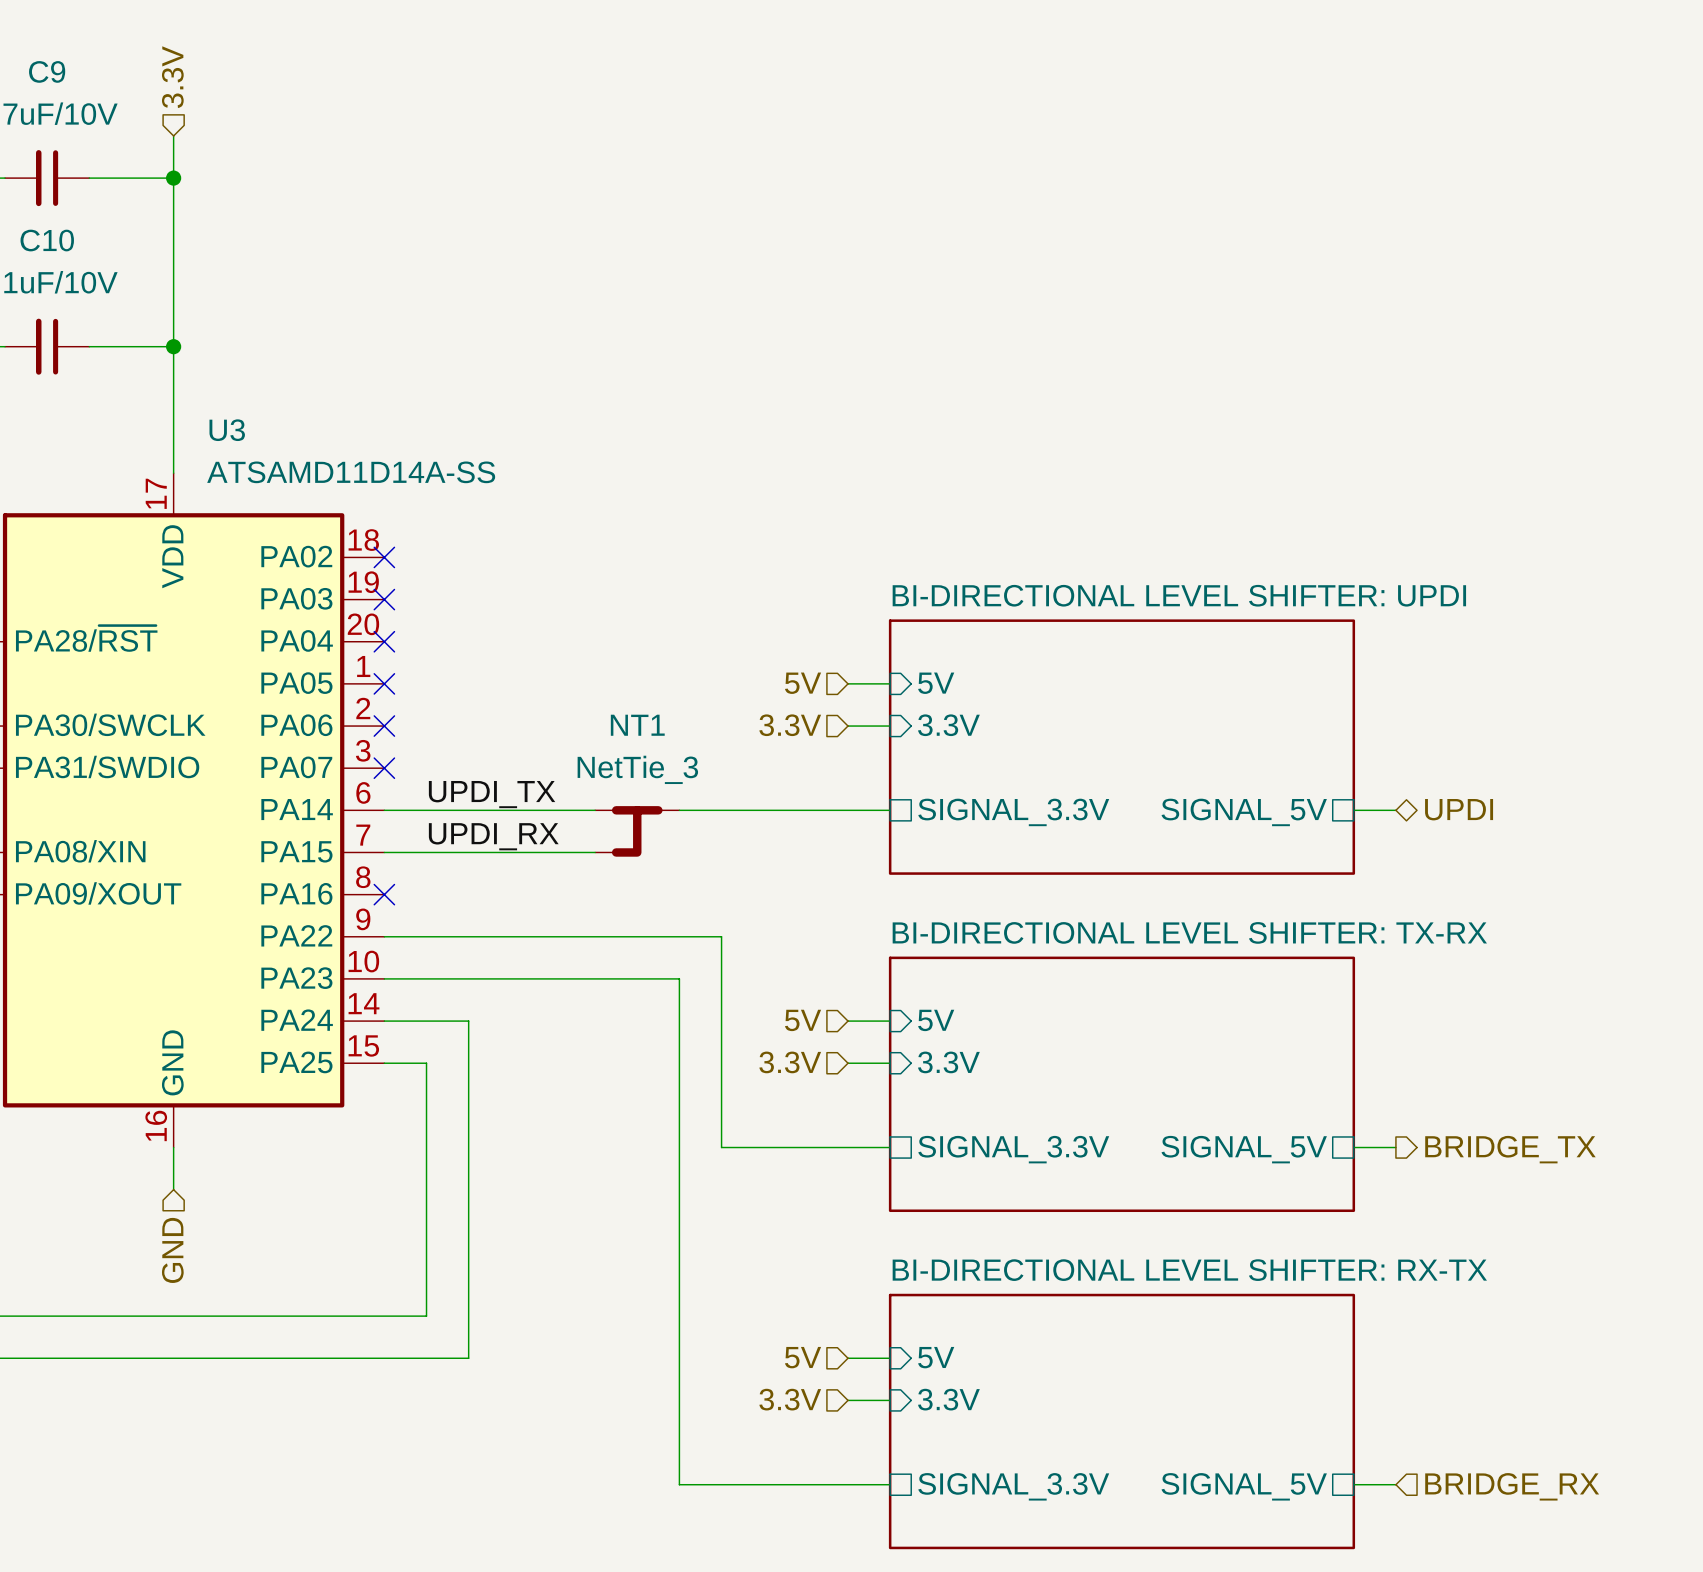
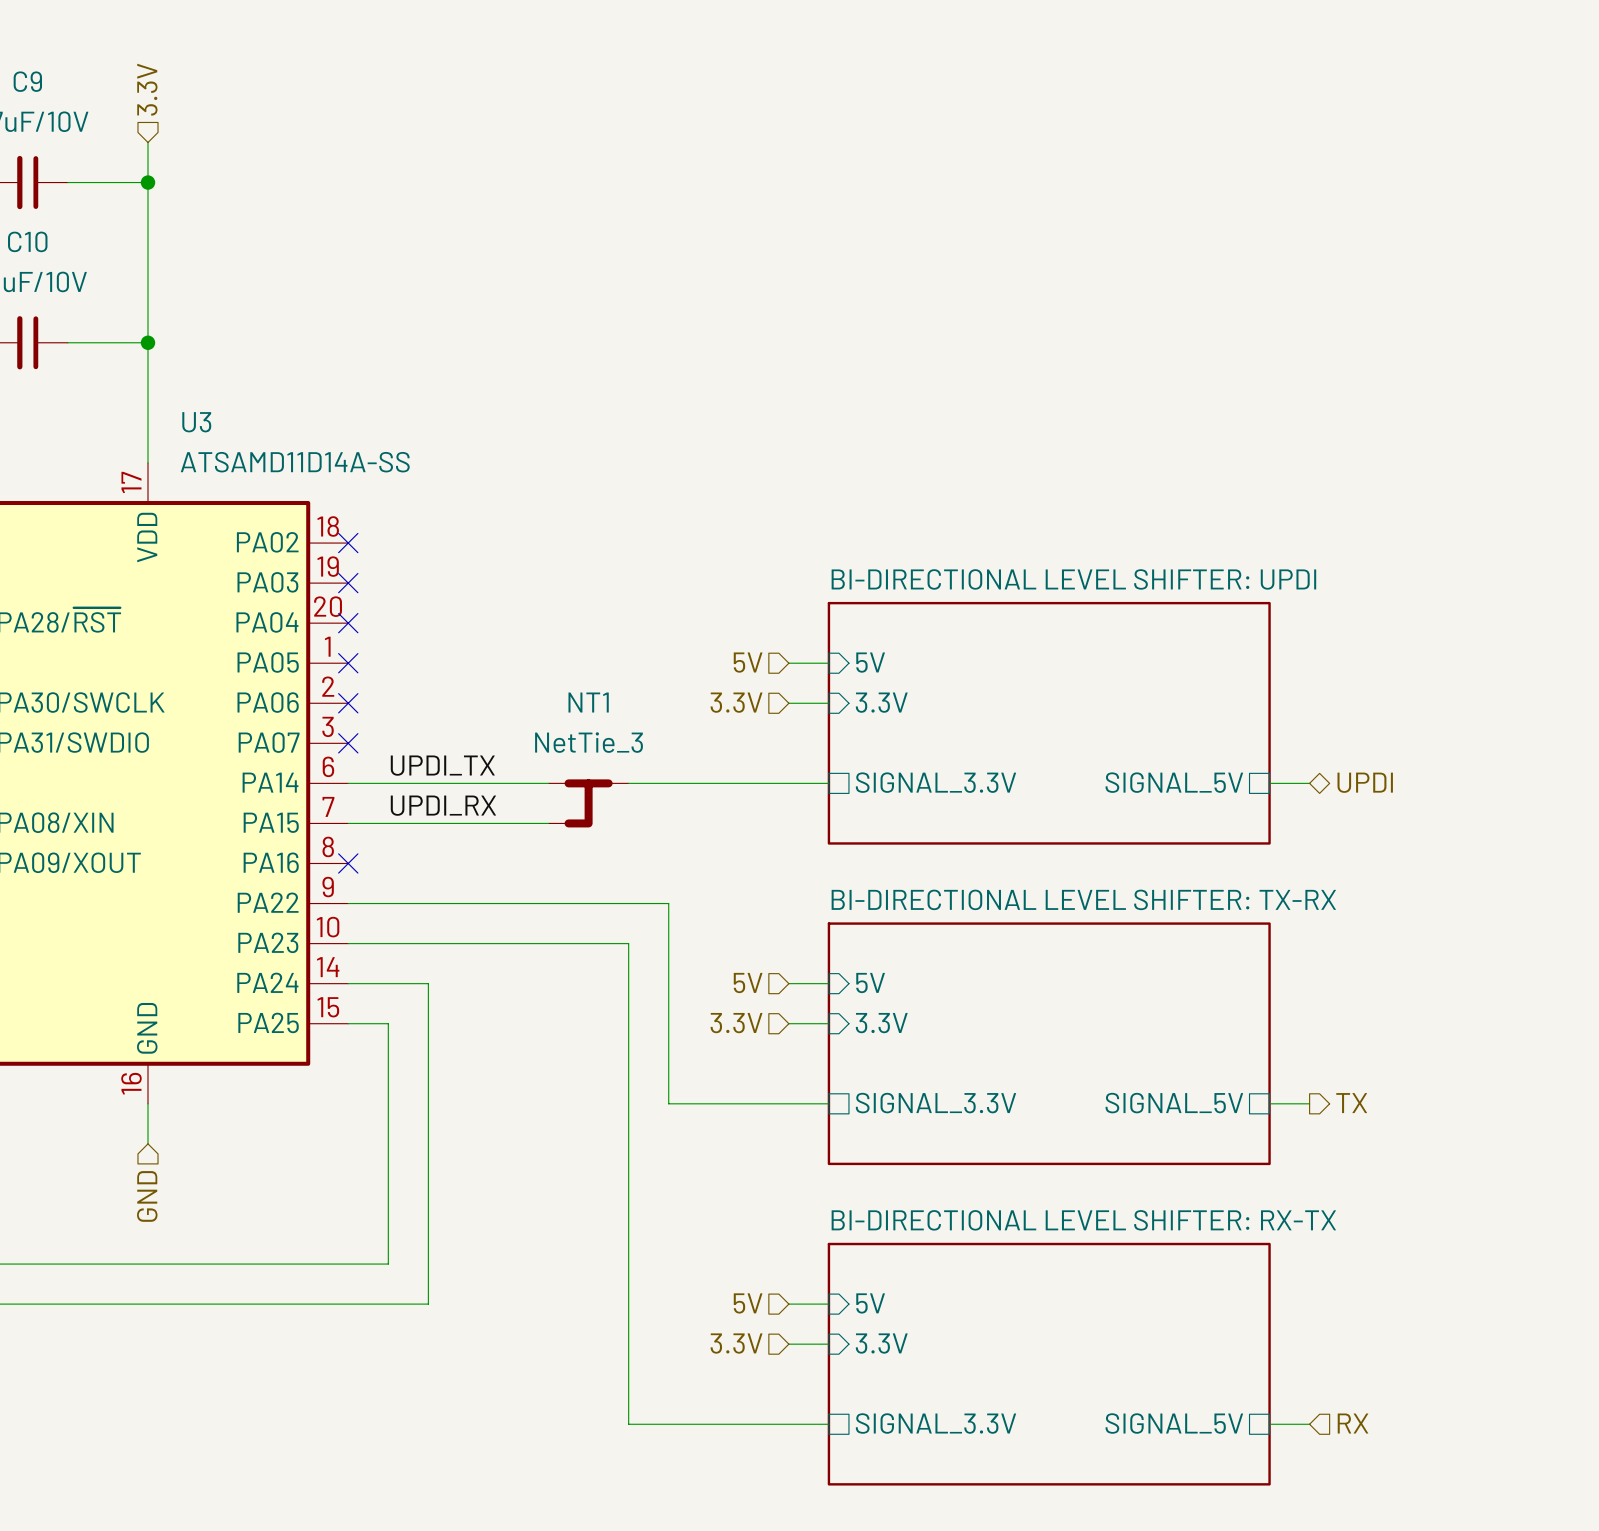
hierarchical label: BRIDGE_TX (1510, 1149) -> TX (1351, 1103)
hierarchical label: BRIDGE_RX (1512, 1486) -> RX (1353, 1423)

